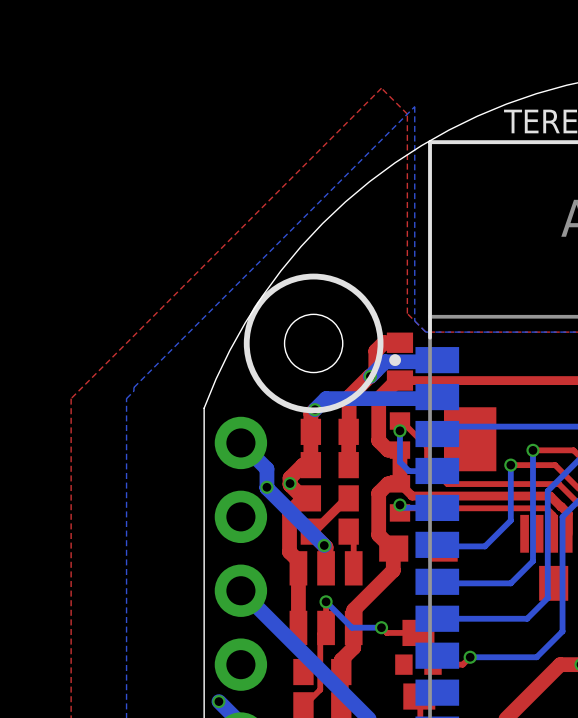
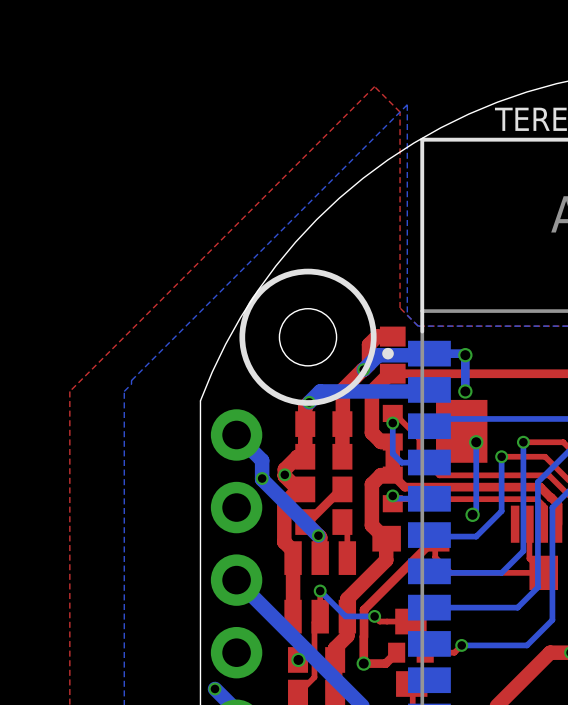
bottom track: none -> (429, 353) (465, 355) (465, 391)
via: none -> (465, 355)
via: none -> (465, 391)
bottom track: none -> (476, 442) (476, 511) (472, 514)
via: none -> (476, 442)
via: none -> (472, 514)
top track: none -> (529, 524) (529, 558) (543, 572) (450, 572) (435, 557) (435, 538) (364, 609) (364, 636)
top track: none -> (363, 637) (363, 663) (385, 663) (396, 652)
via: none -> (298, 659)
via: none -> (363, 663)

